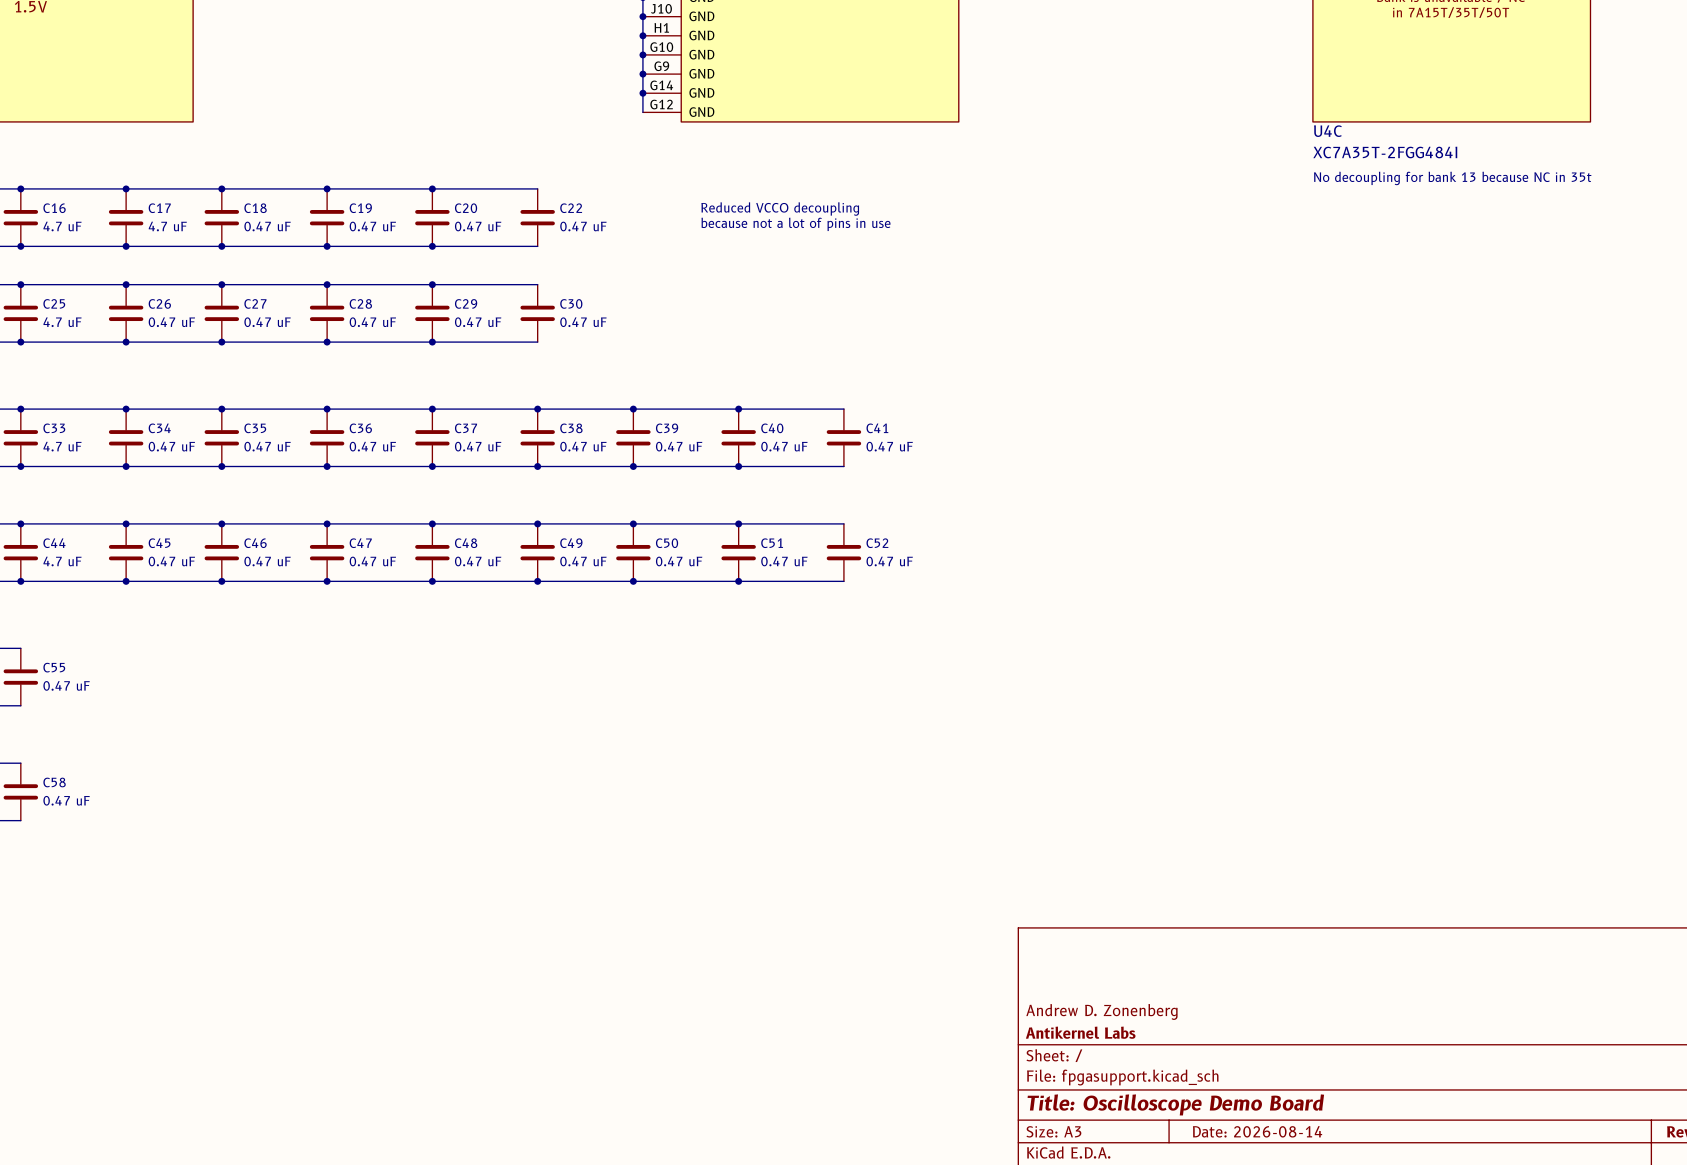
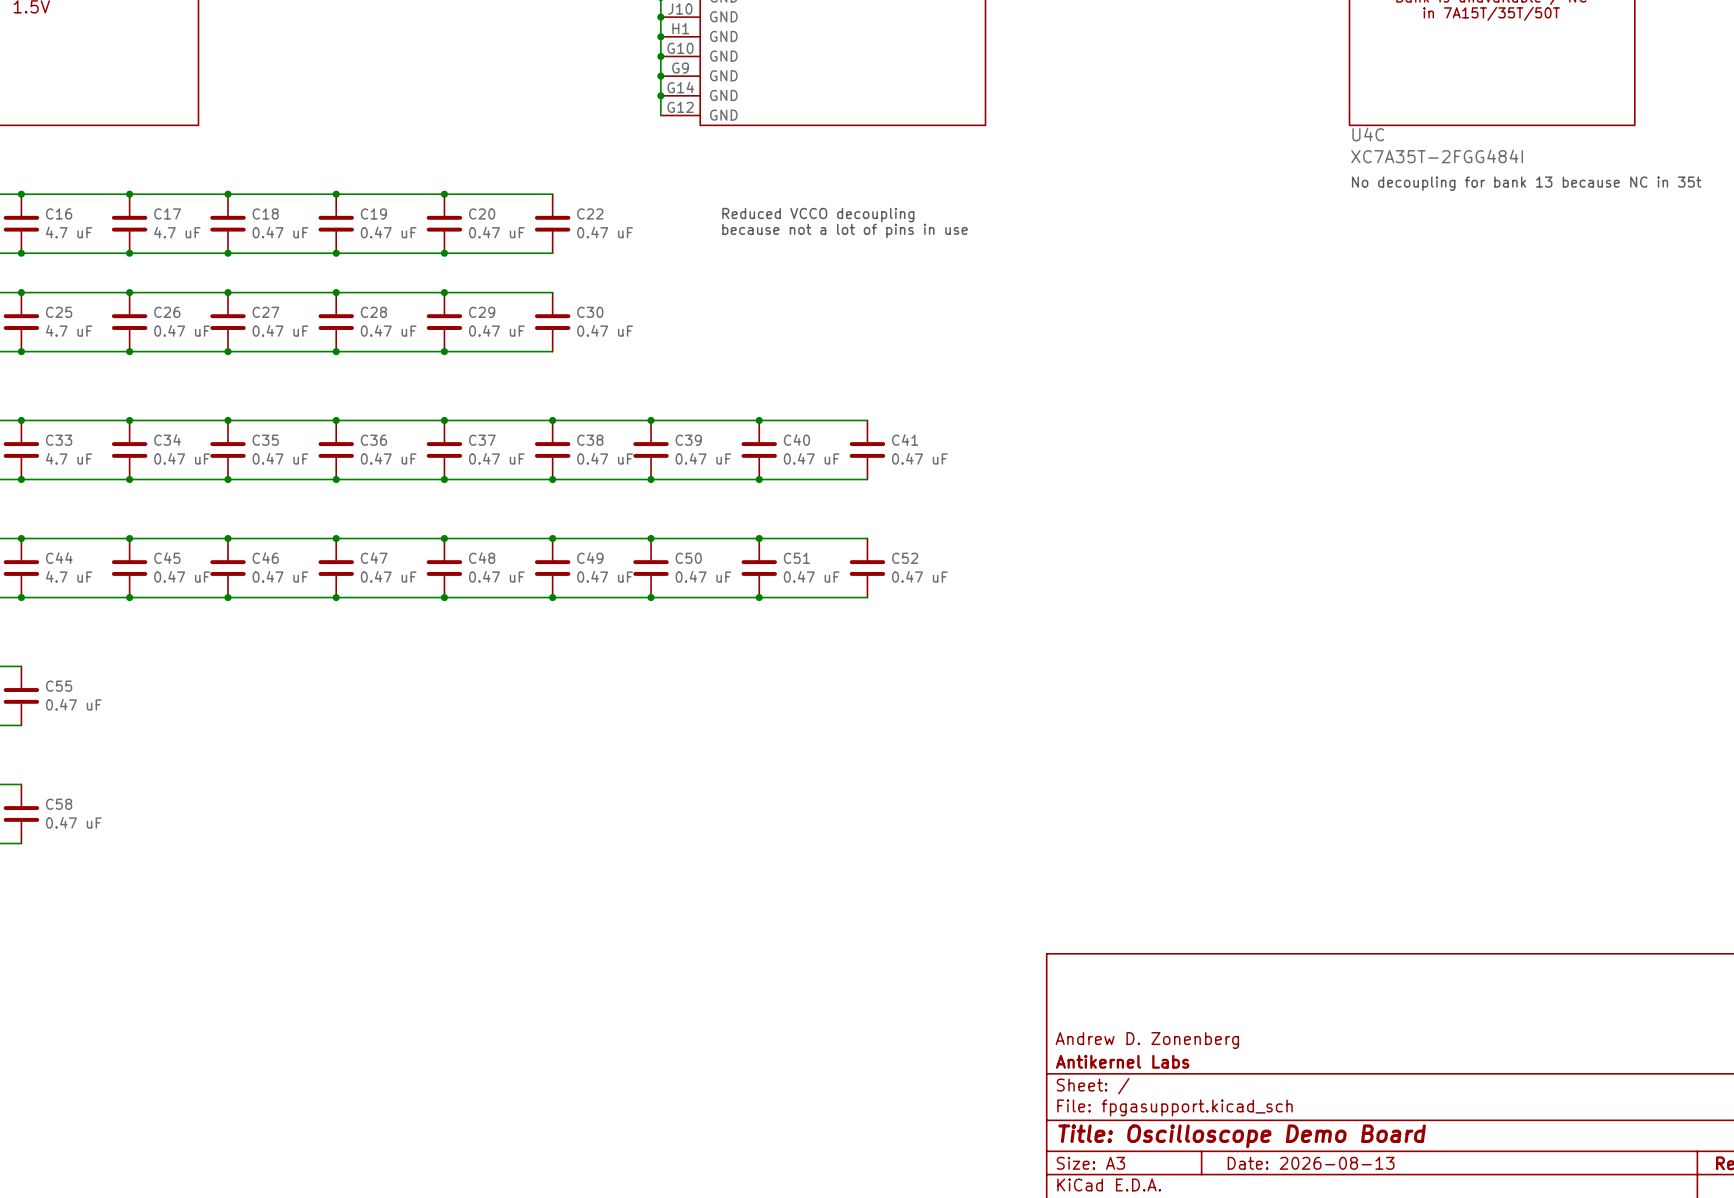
title block: Date: 2026-08-14 (1257, 1131) -> Date: 2026-08-13 (1311, 1163)

